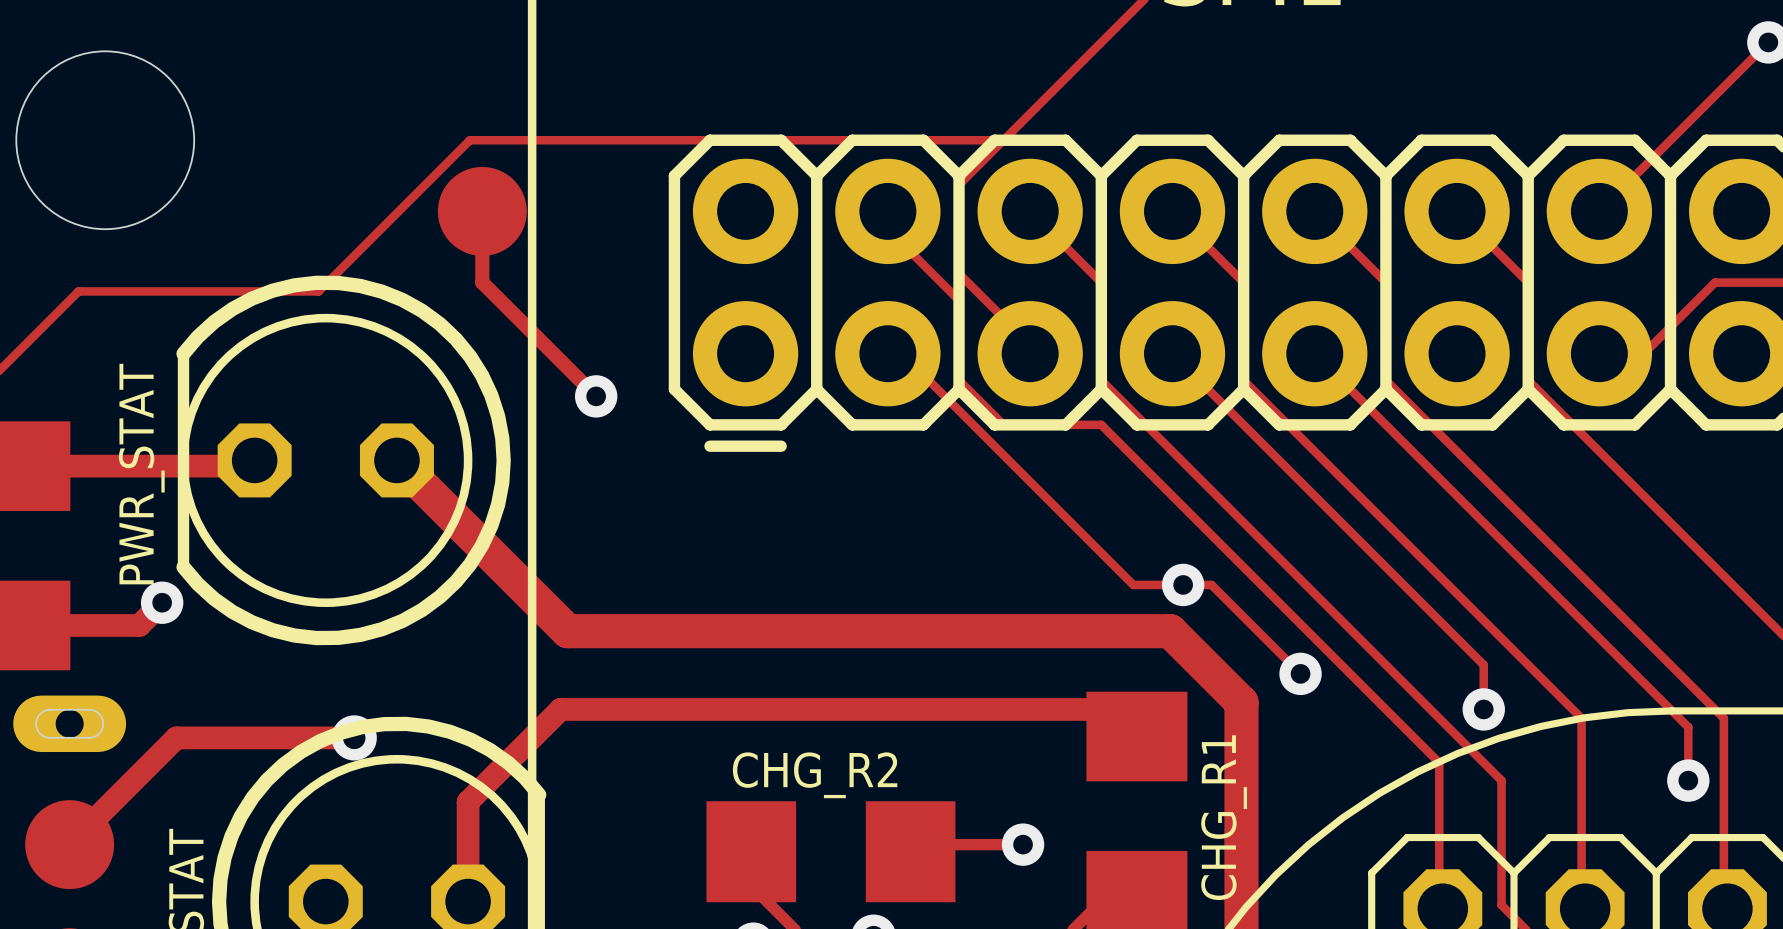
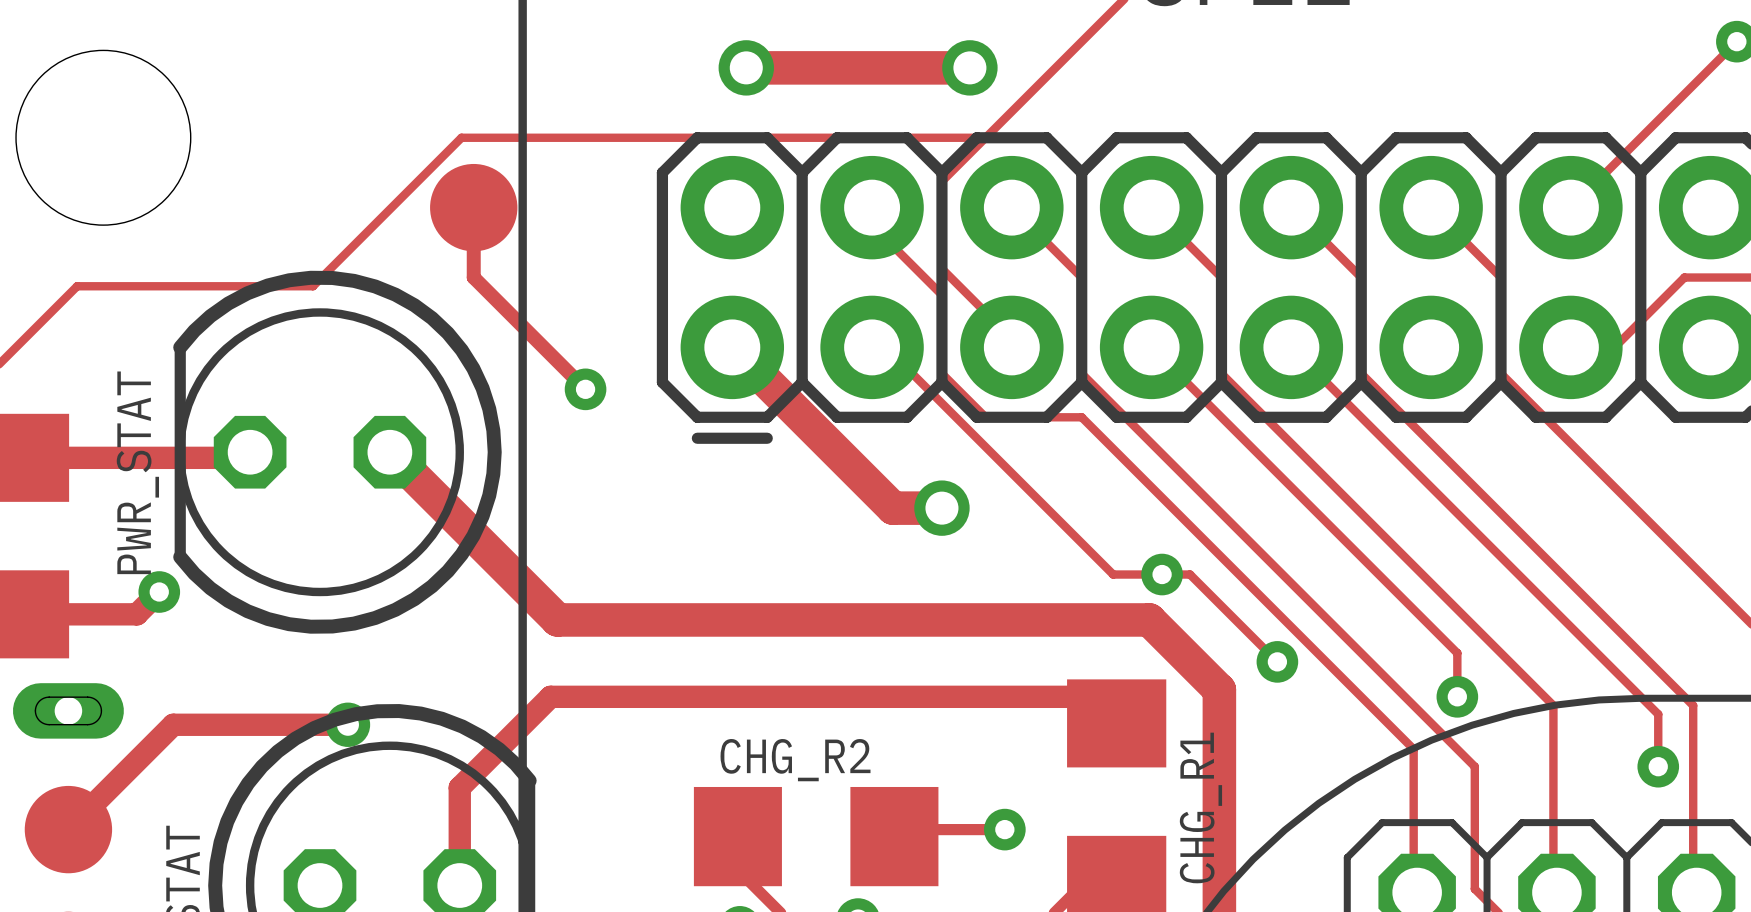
track: none -> (746, 67) (969, 67)
via: none -> (746, 67)
via: none -> (969, 67)
track: none -> (732, 347) (893, 508) (941, 508)
via: none -> (941, 508)

